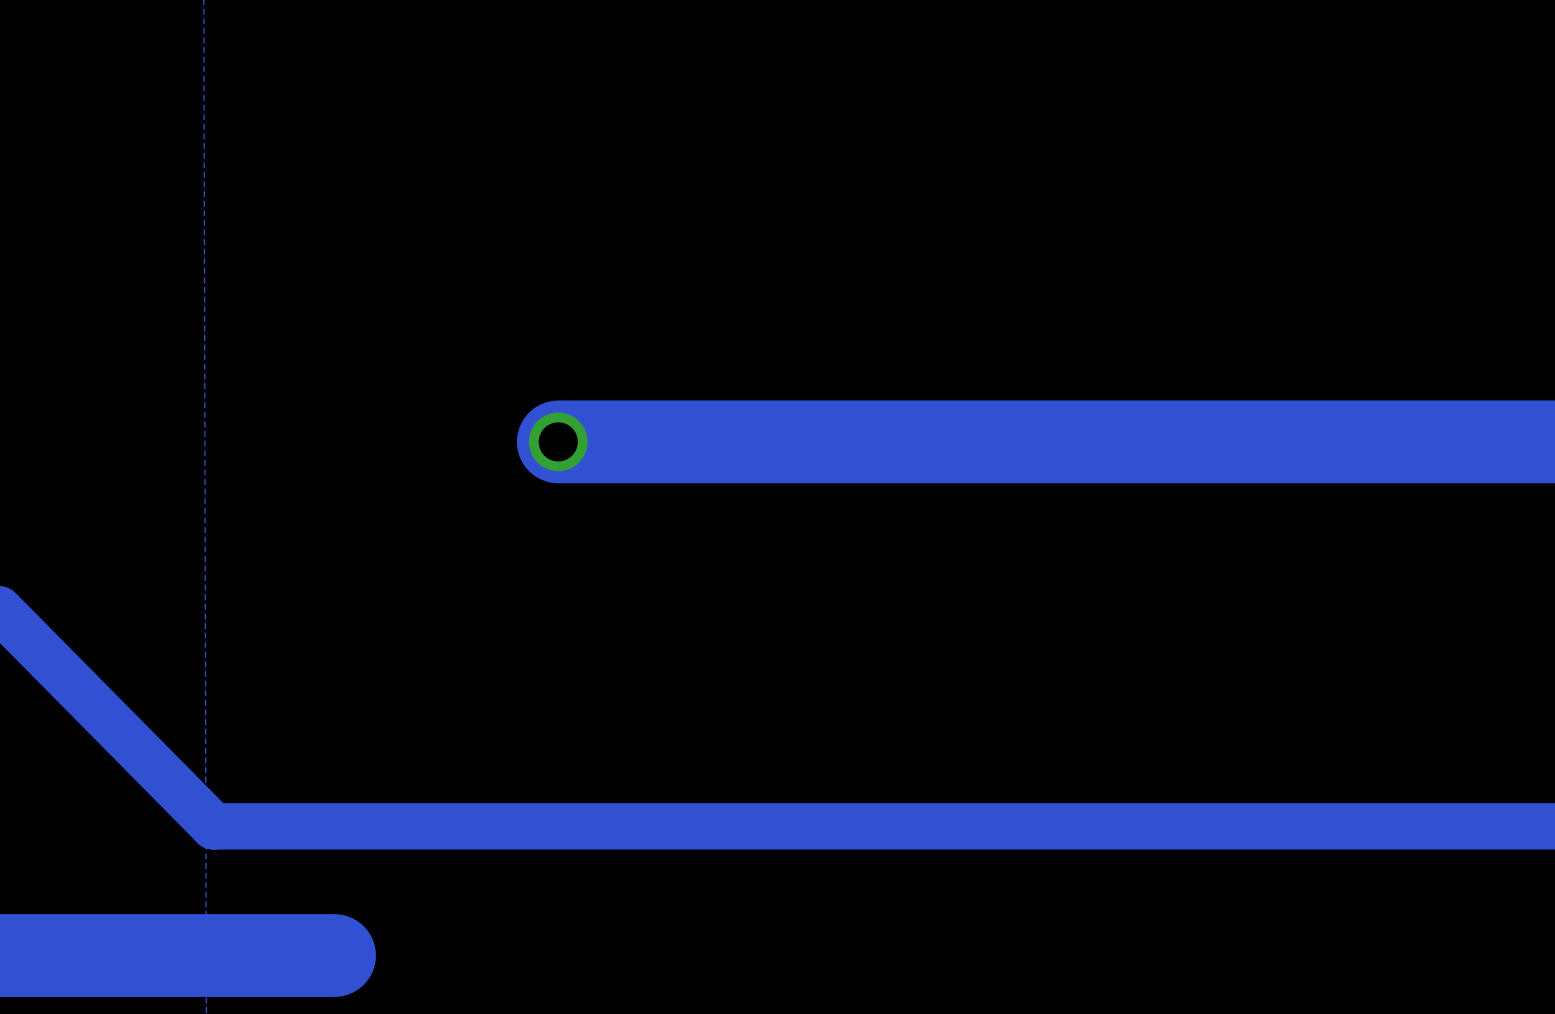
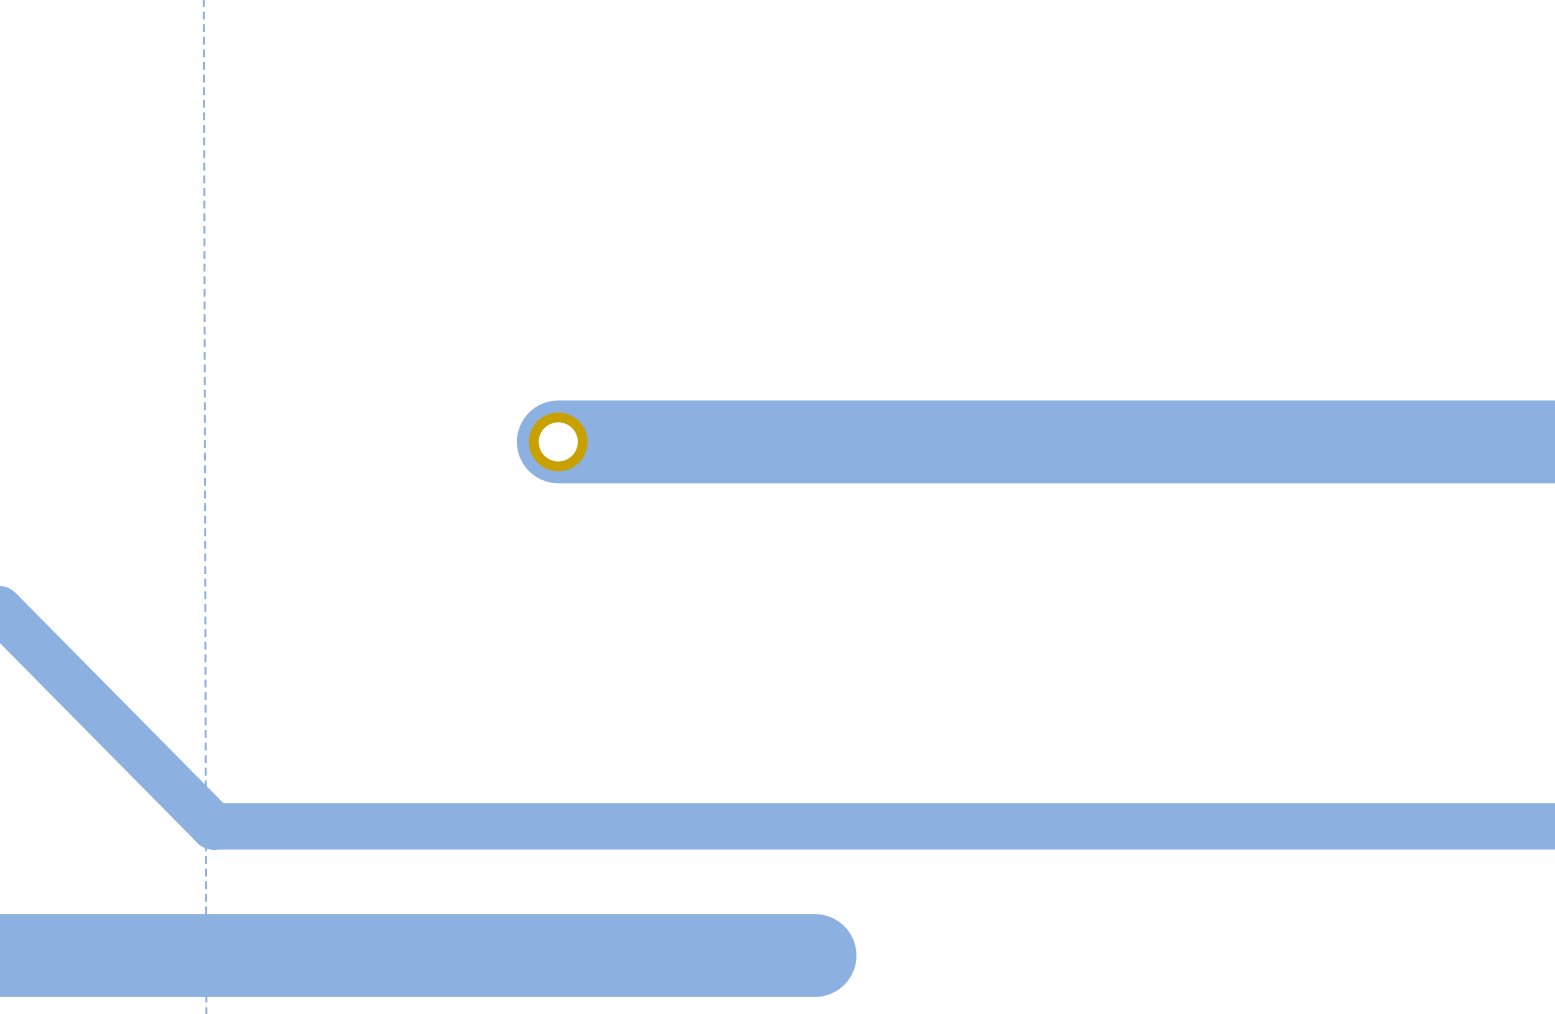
bottom track: none -> (815, 955) (334, 955)

